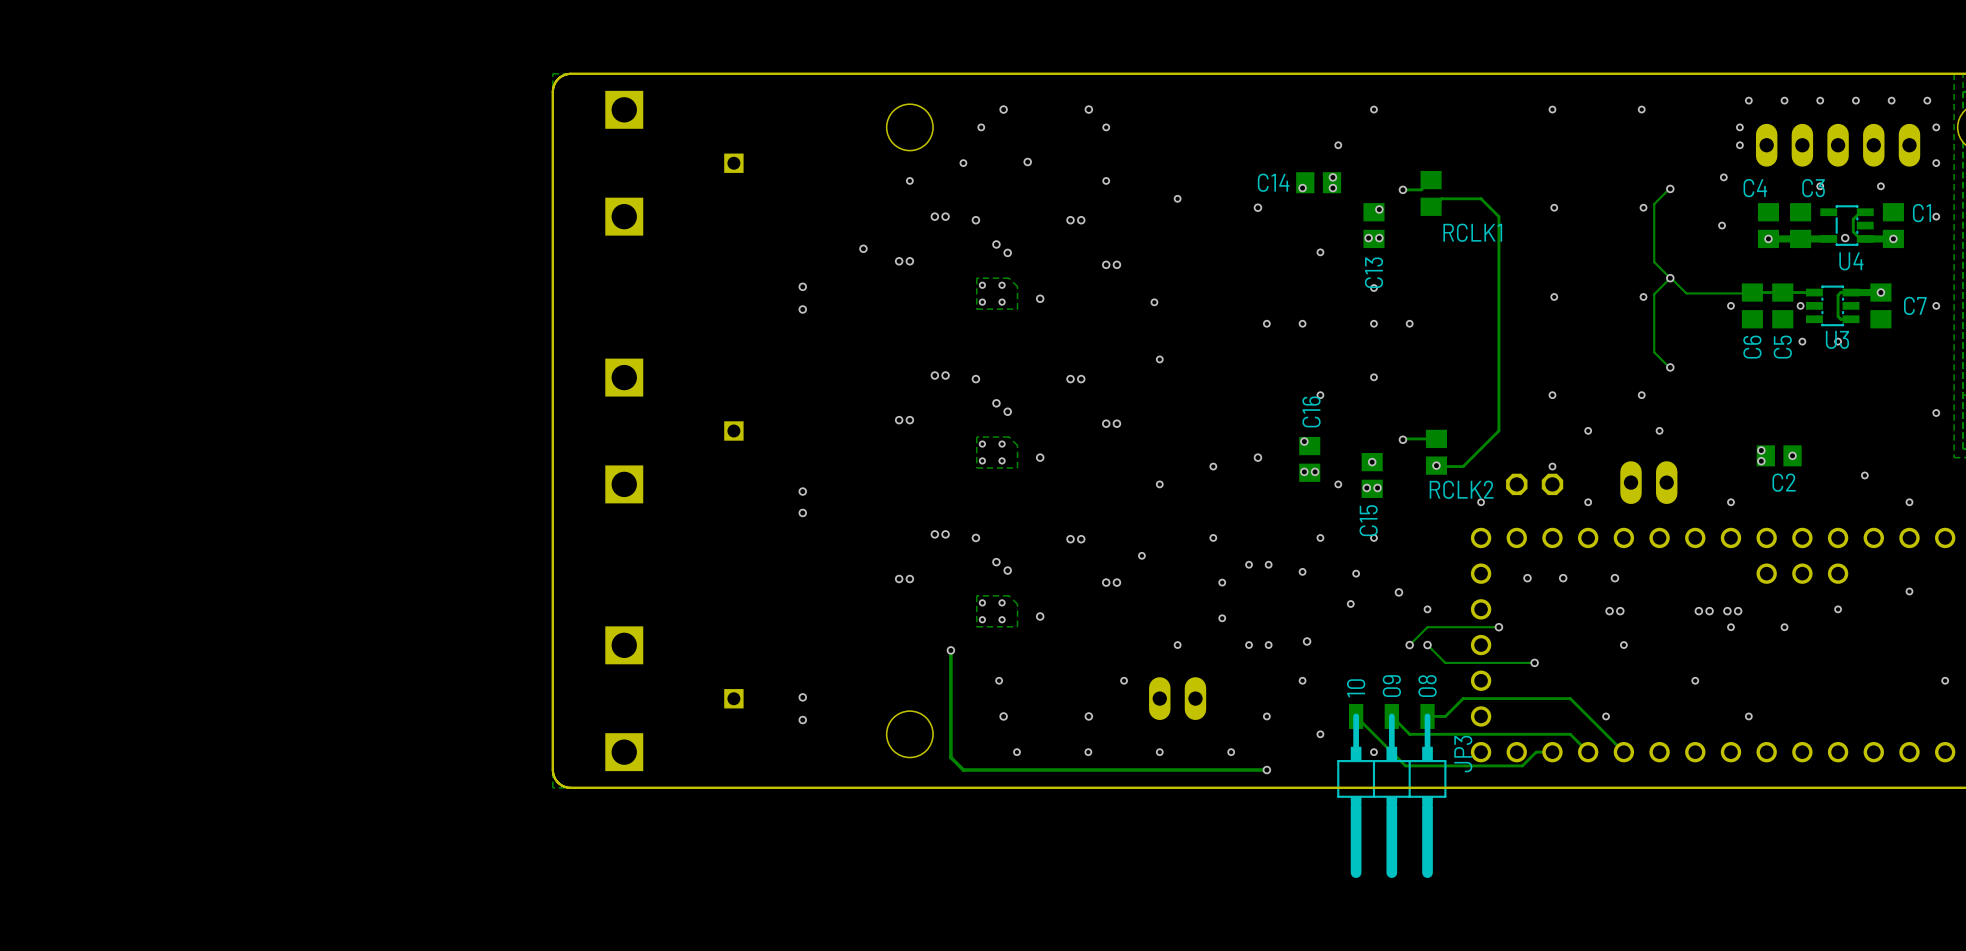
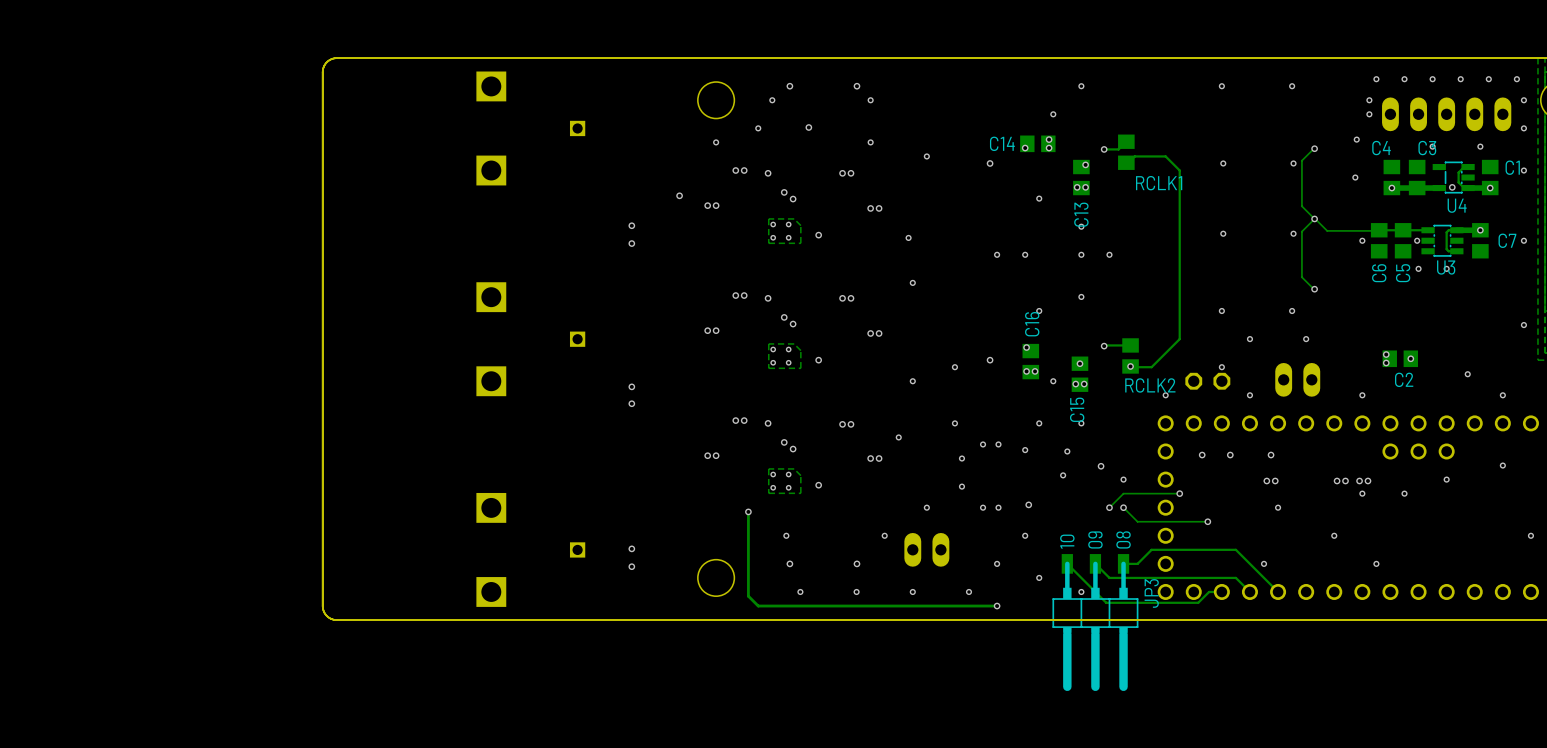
board edge: none -> (336, 58) (326, 62) (322, 72)
board edge: none -> (336, 58) (326, 62) (322, 72)
board edge: none -> (449, 58) (336, 58)
board edge: (552, 91) (552, 770) -> (322, 72) (322, 606)
board edge: (552, 91) (558, 79) (570, 73) (563, 75) (558, 79) (554, 84) (552, 91) -> none
board edge: none -> (322, 606) (326, 615) (336, 620)
board edge: none -> (322, 606) (326, 615) (336, 620)
board edge: (552, 770) (558, 782) (570, 787) (563, 786) (558, 782) (554, 776) (552, 770) -> none
board edge: none -> (449, 620) (336, 620)

